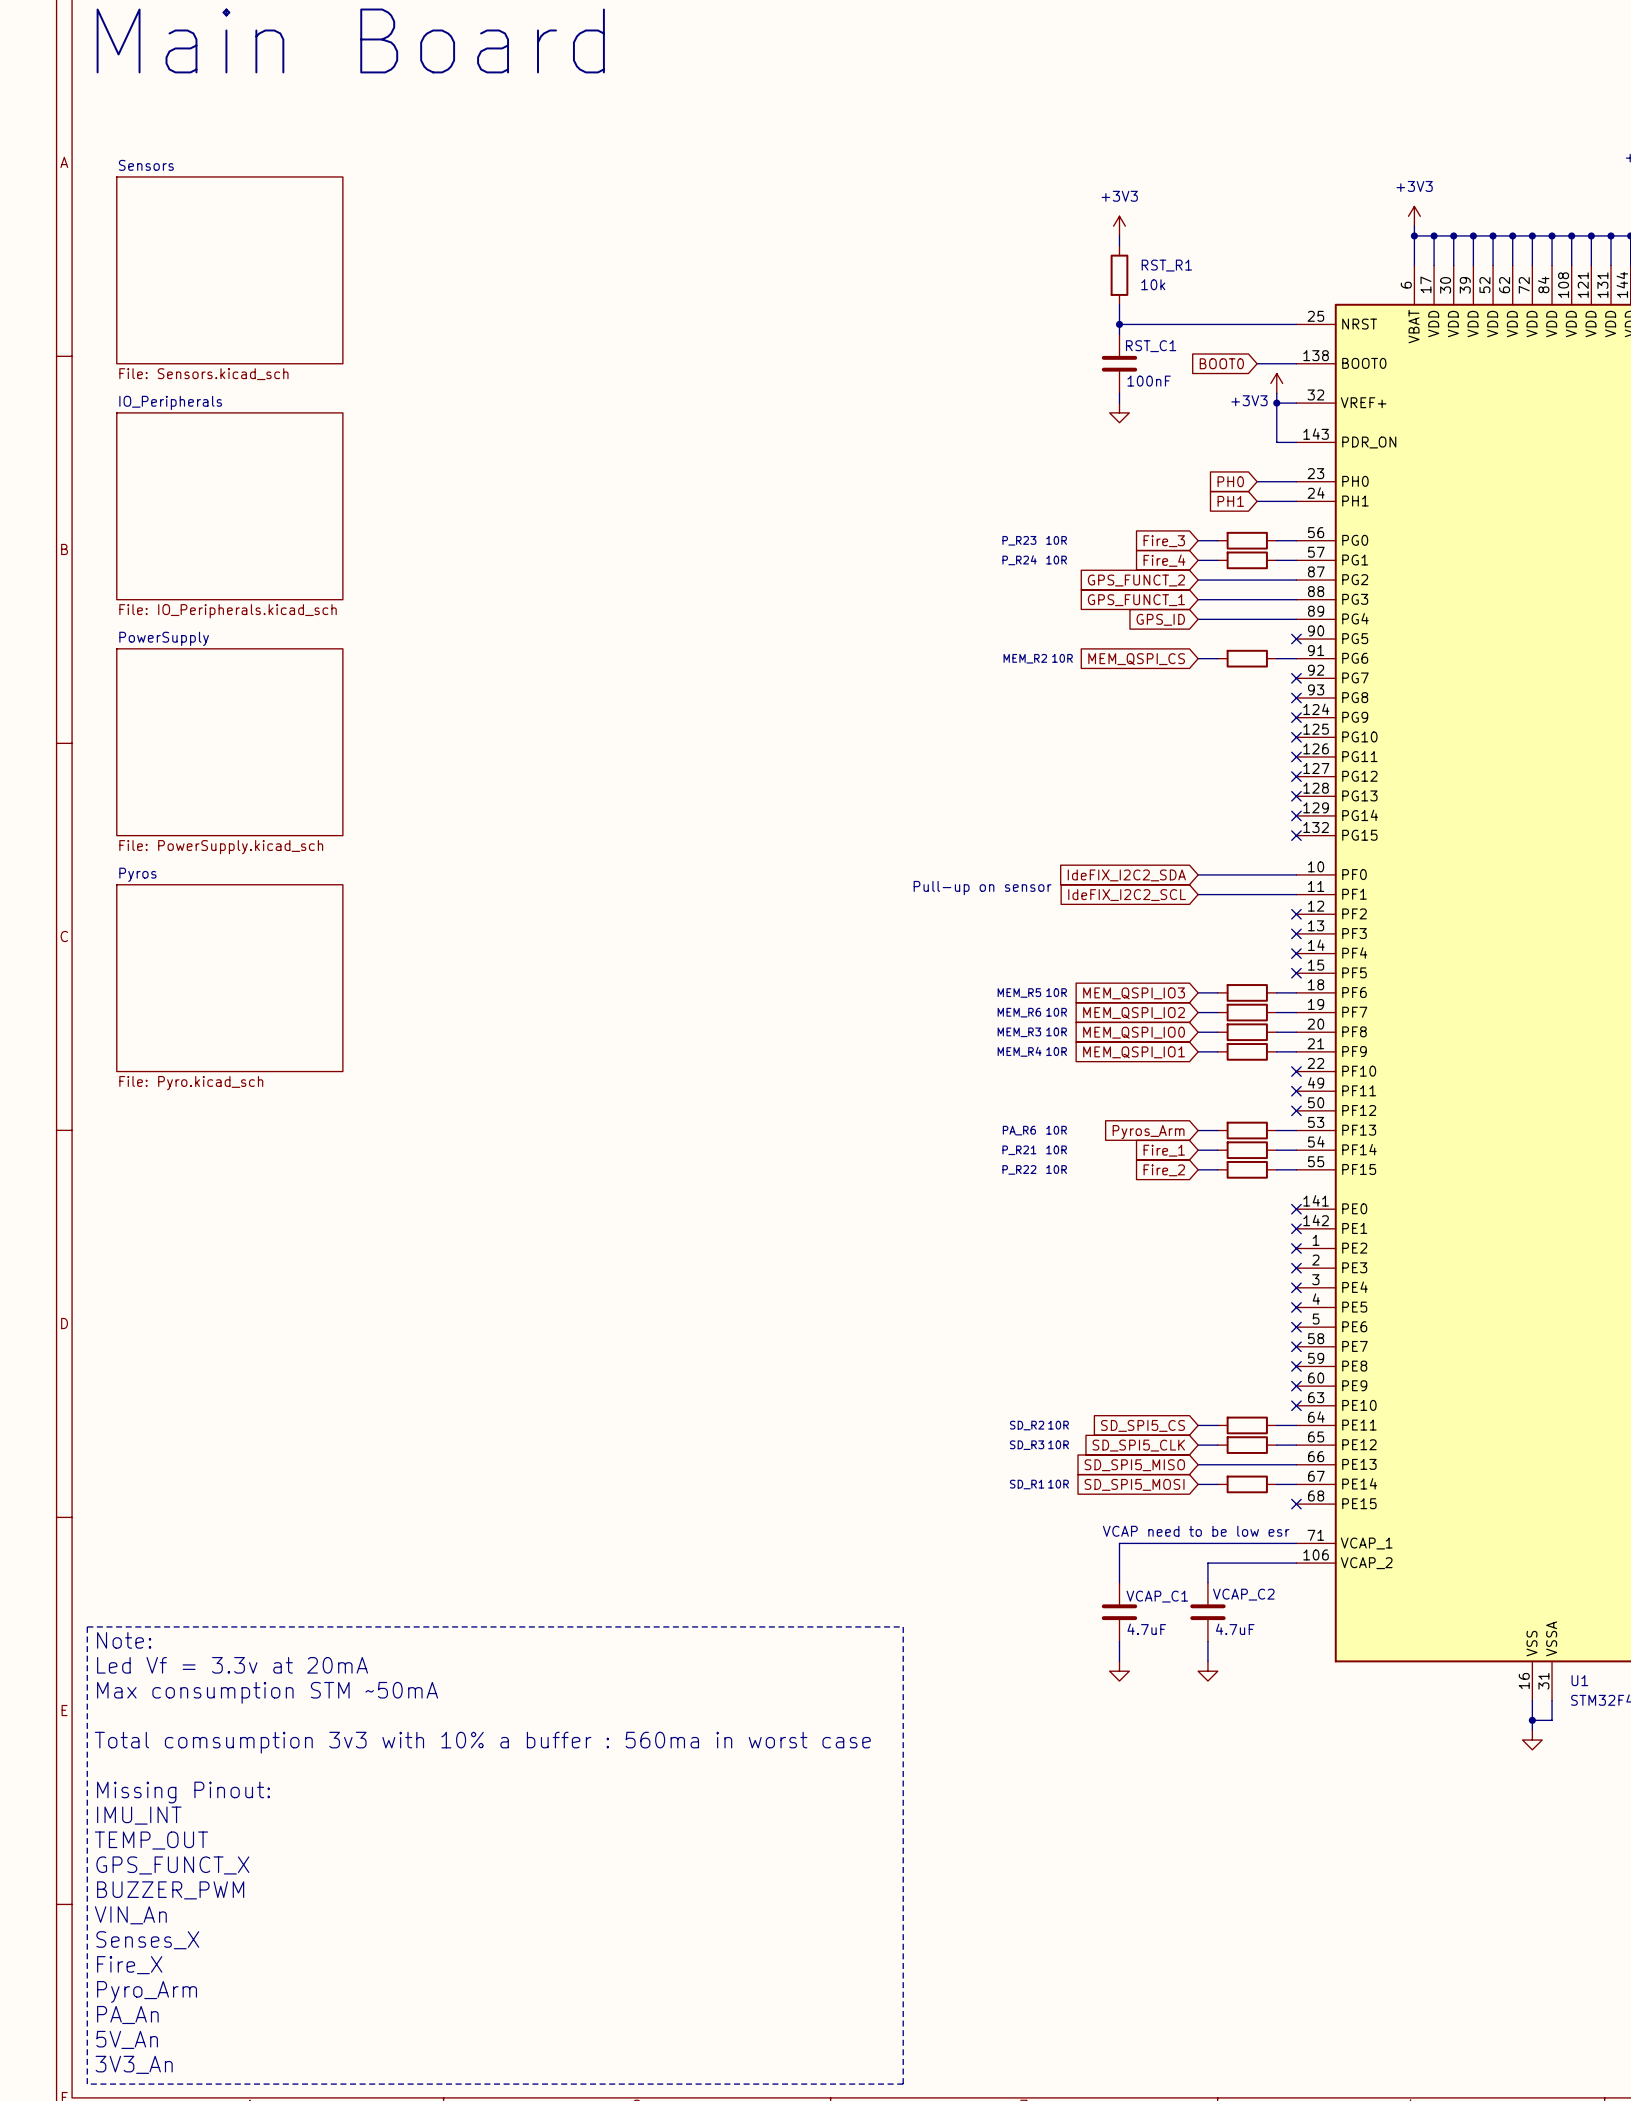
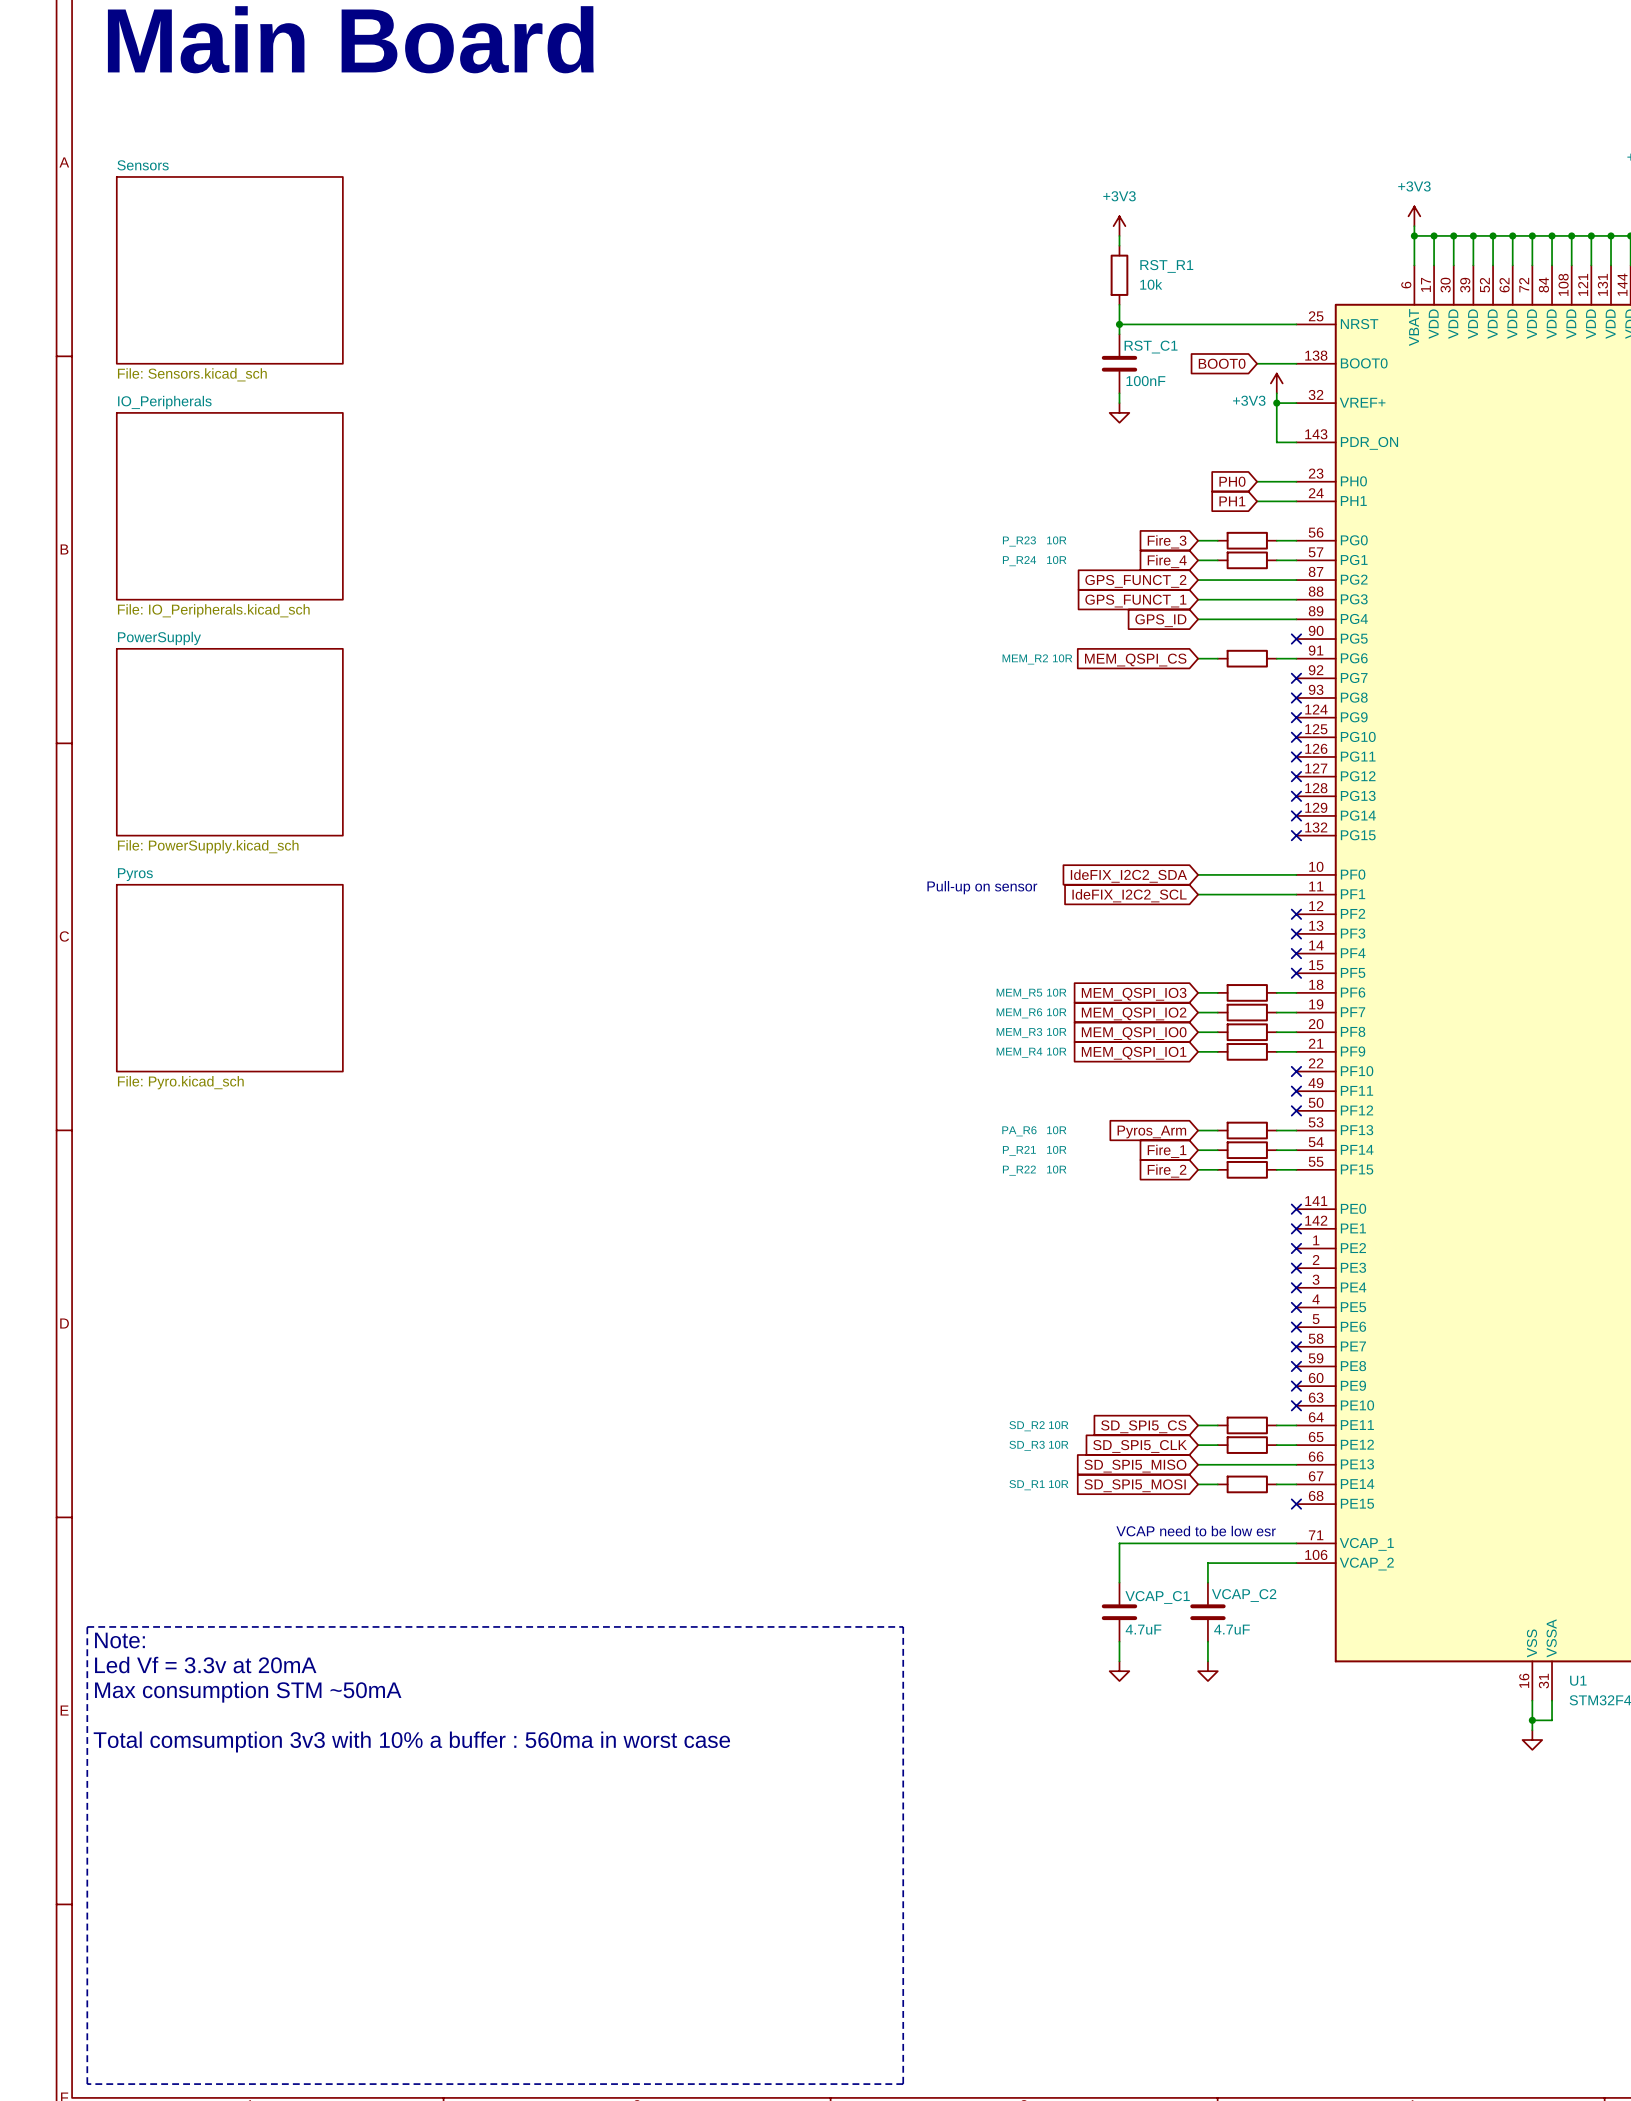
text: Missing Pinout: (183, 1792) -> none
text: IMU_INT (139, 1815) -> none
text: TEMP_OUT (151, 1840) -> none
text: GPS_FUNCT_X (172, 1865) -> none
text: BUZZER_PWM (170, 1890) -> none
text: VIN_An (130, 1915) -> none
text: Senses_X (147, 1940) -> none
text: Fire_X (129, 1965) -> none
text: Pyro_Arm (147, 1991) -> none
text: PA_An (127, 2014) -> none
text: 5V_An (127, 2039) -> none
text: 3V3_An (134, 2064) -> none

